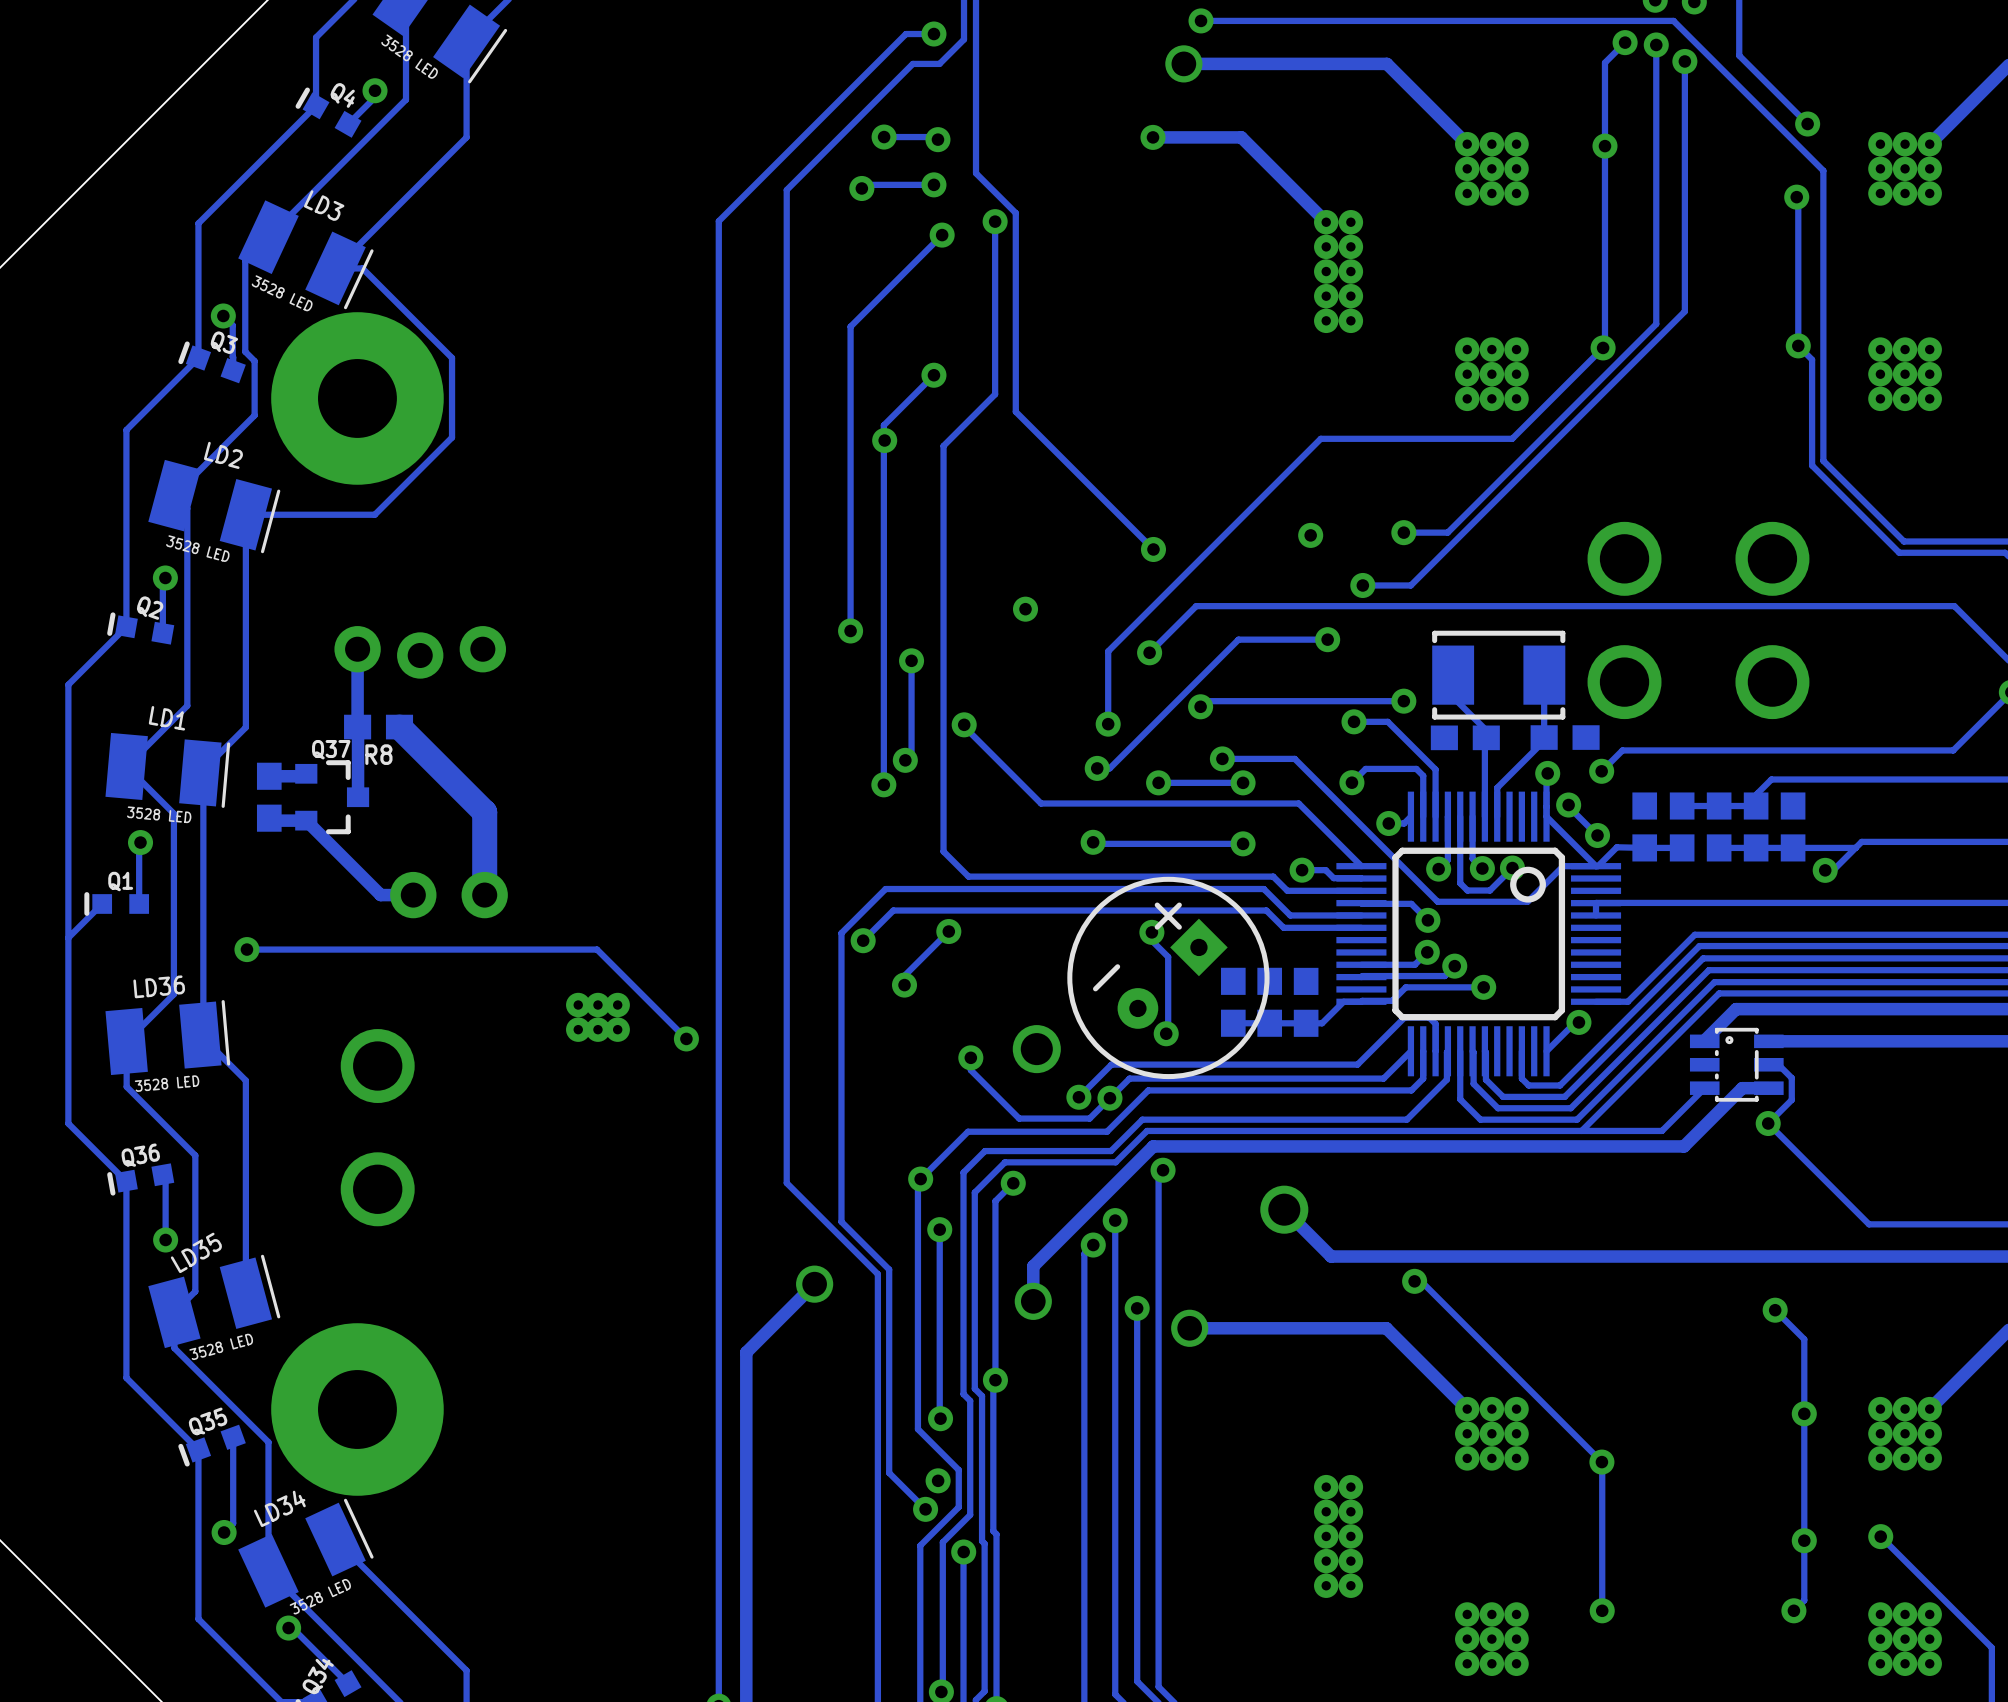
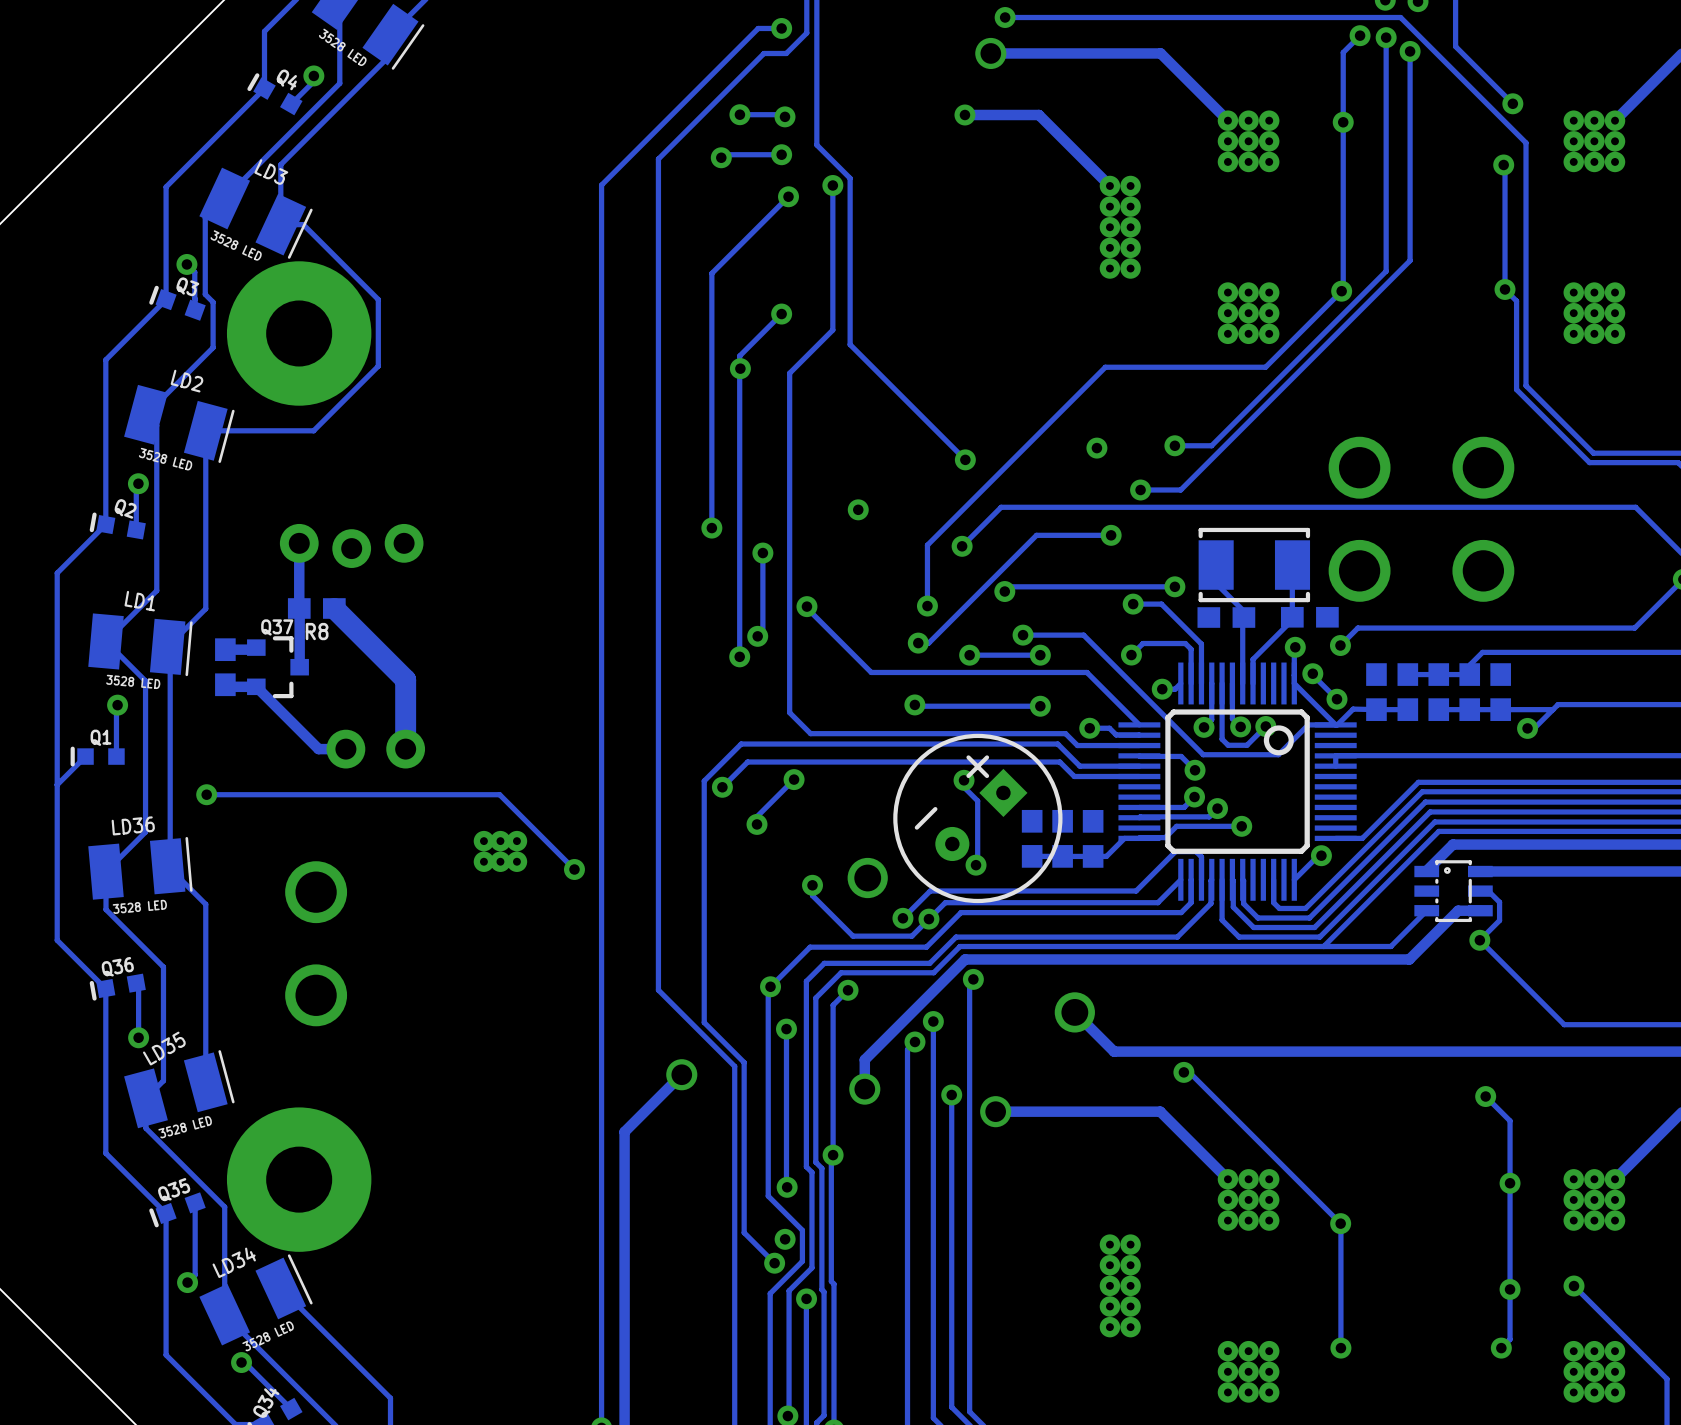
track: (466, 65) (466, 137) (335, 268) -> (390, 54) (280, 164) (280, 224)

